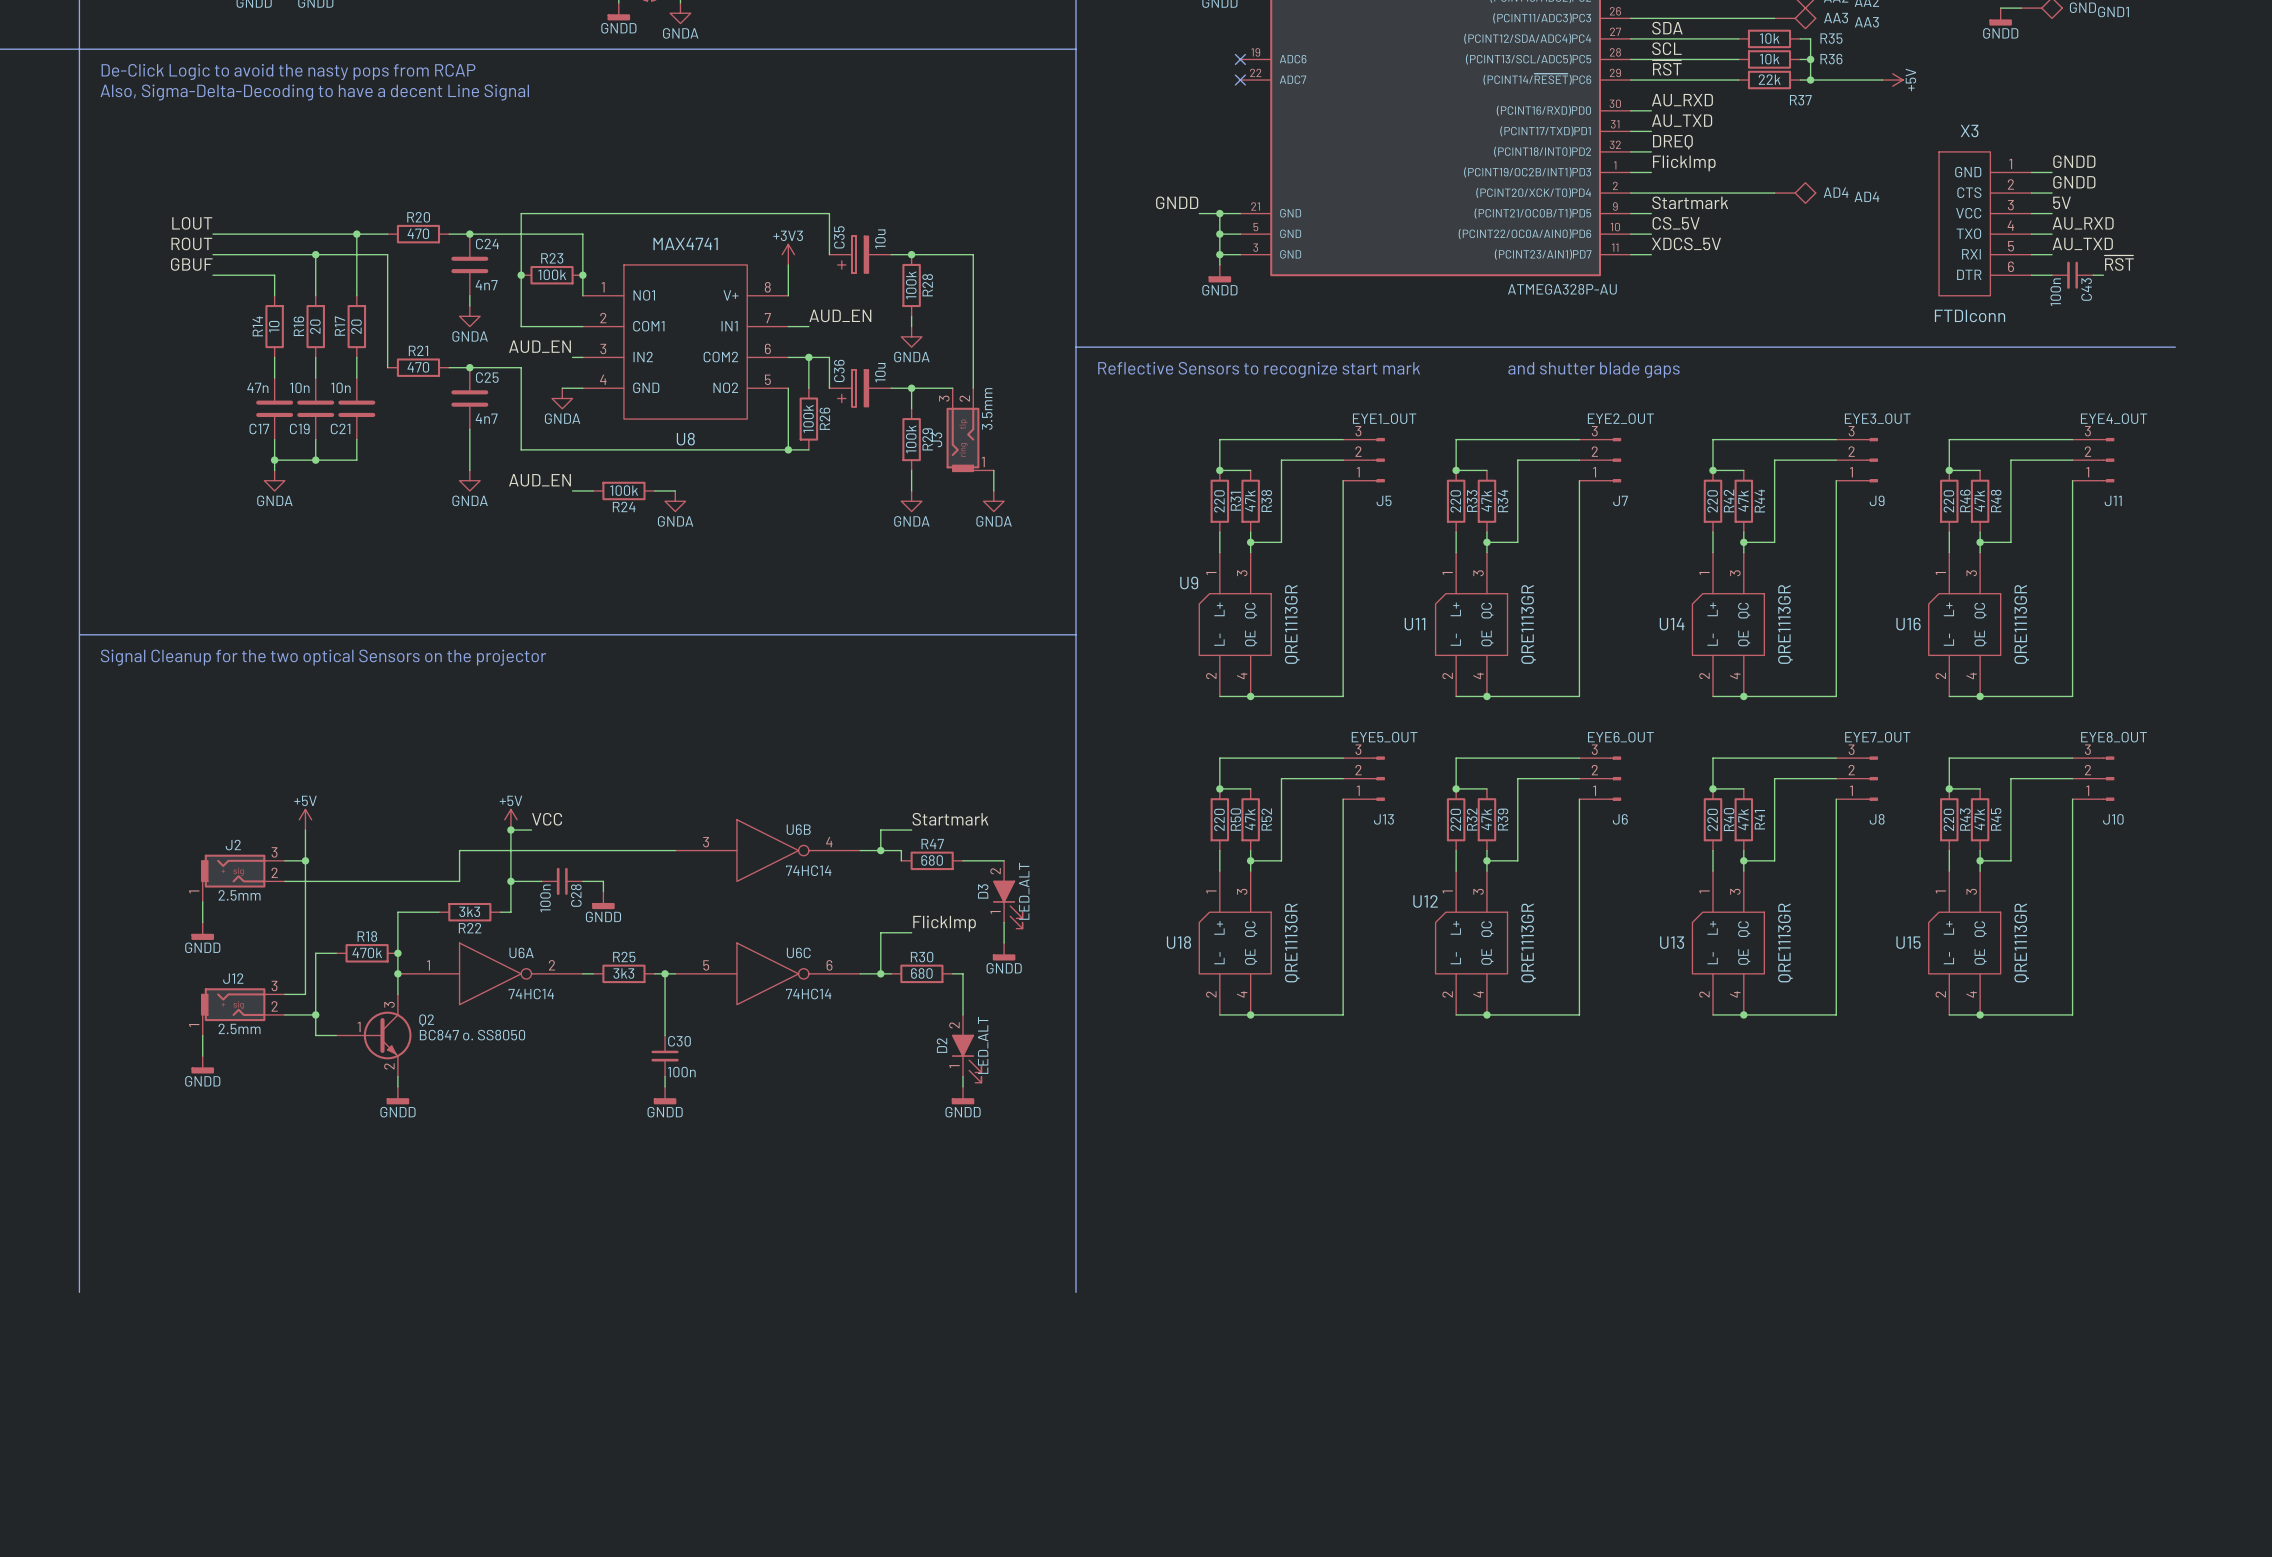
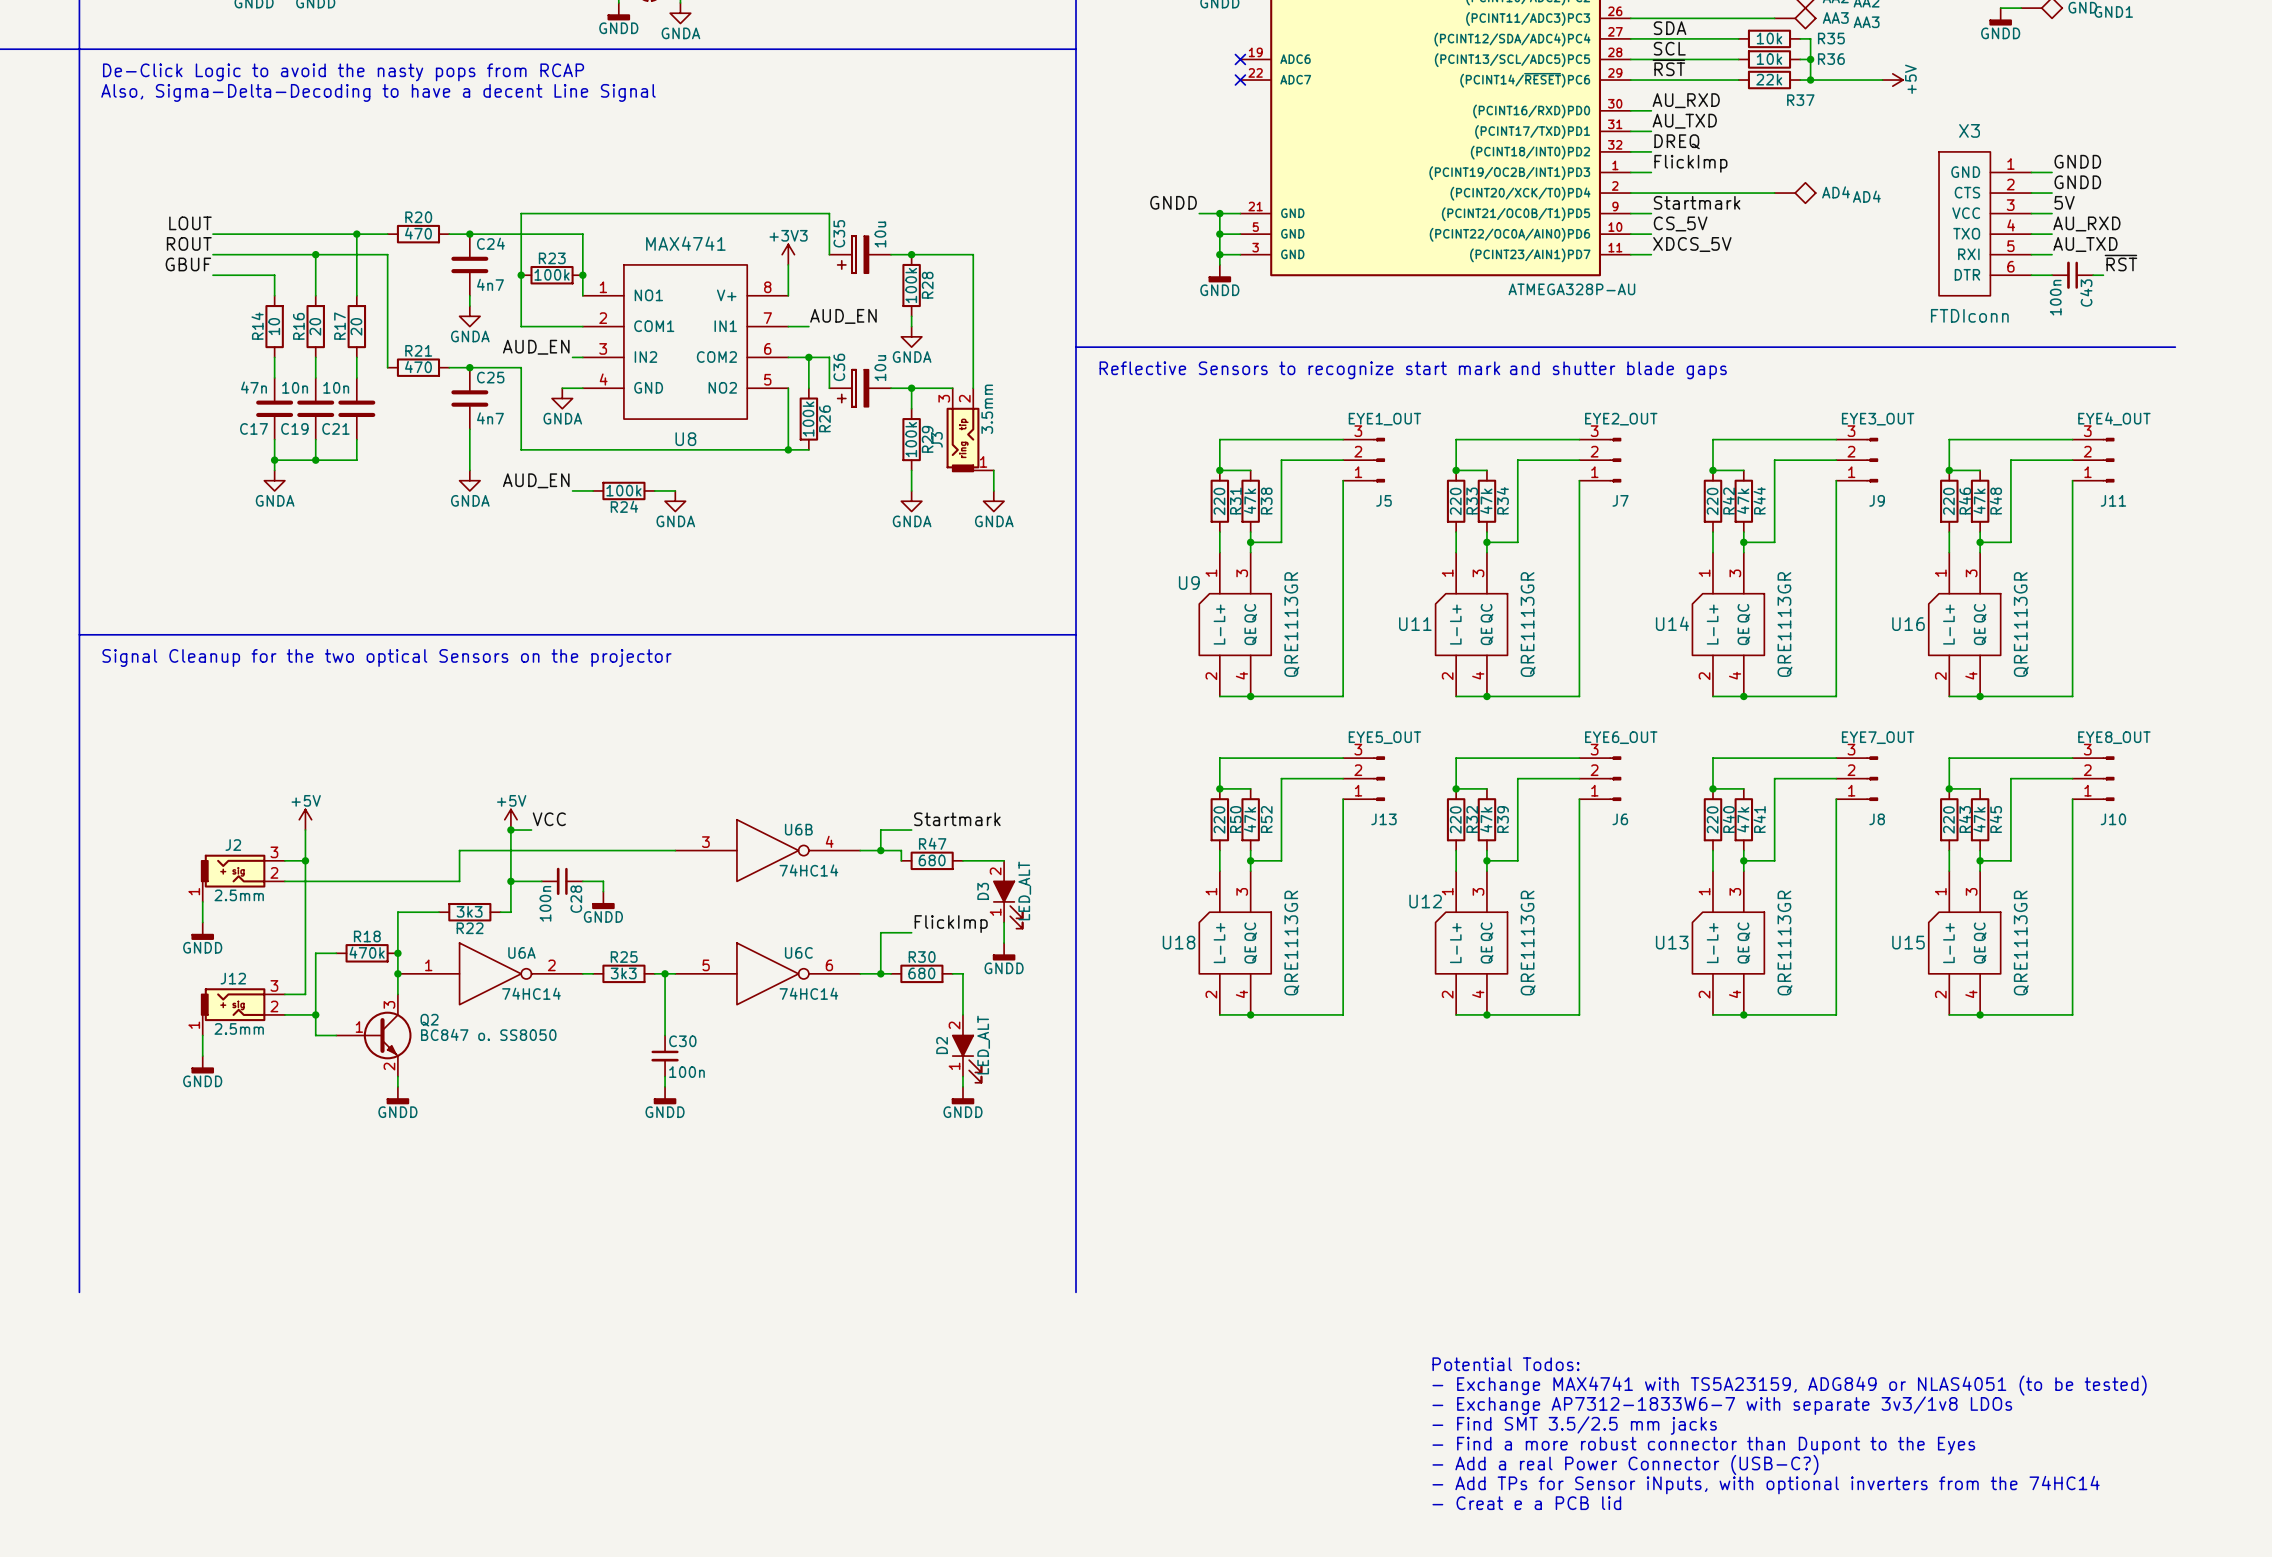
text: none -> Potential Todos: (1505, 1364)
text: none -> - Exchange MAX4741 with TS5A23159, ADG849 or NLAS4051 (to be tested) (1789, 1385)
text: none -> - Exchange AP7312-1833W6-7 with separate 3v3/1v8 LDOs (1722, 1405)
text: none -> - Find SMT 3.5/2.5 mm jacks (1574, 1425)
text: none -> - Find a more robust connector than Dupont to the Eyes (1703, 1445)
text: none -> - Add a real Power Connector (USB-C?) (1625, 1464)
text: none -> - Add TPs for Sensor iNputs, with optional inverters from the 74HC14 (1766, 1485)
text: none -> - Creat e a PCB lid (1526, 1503)

